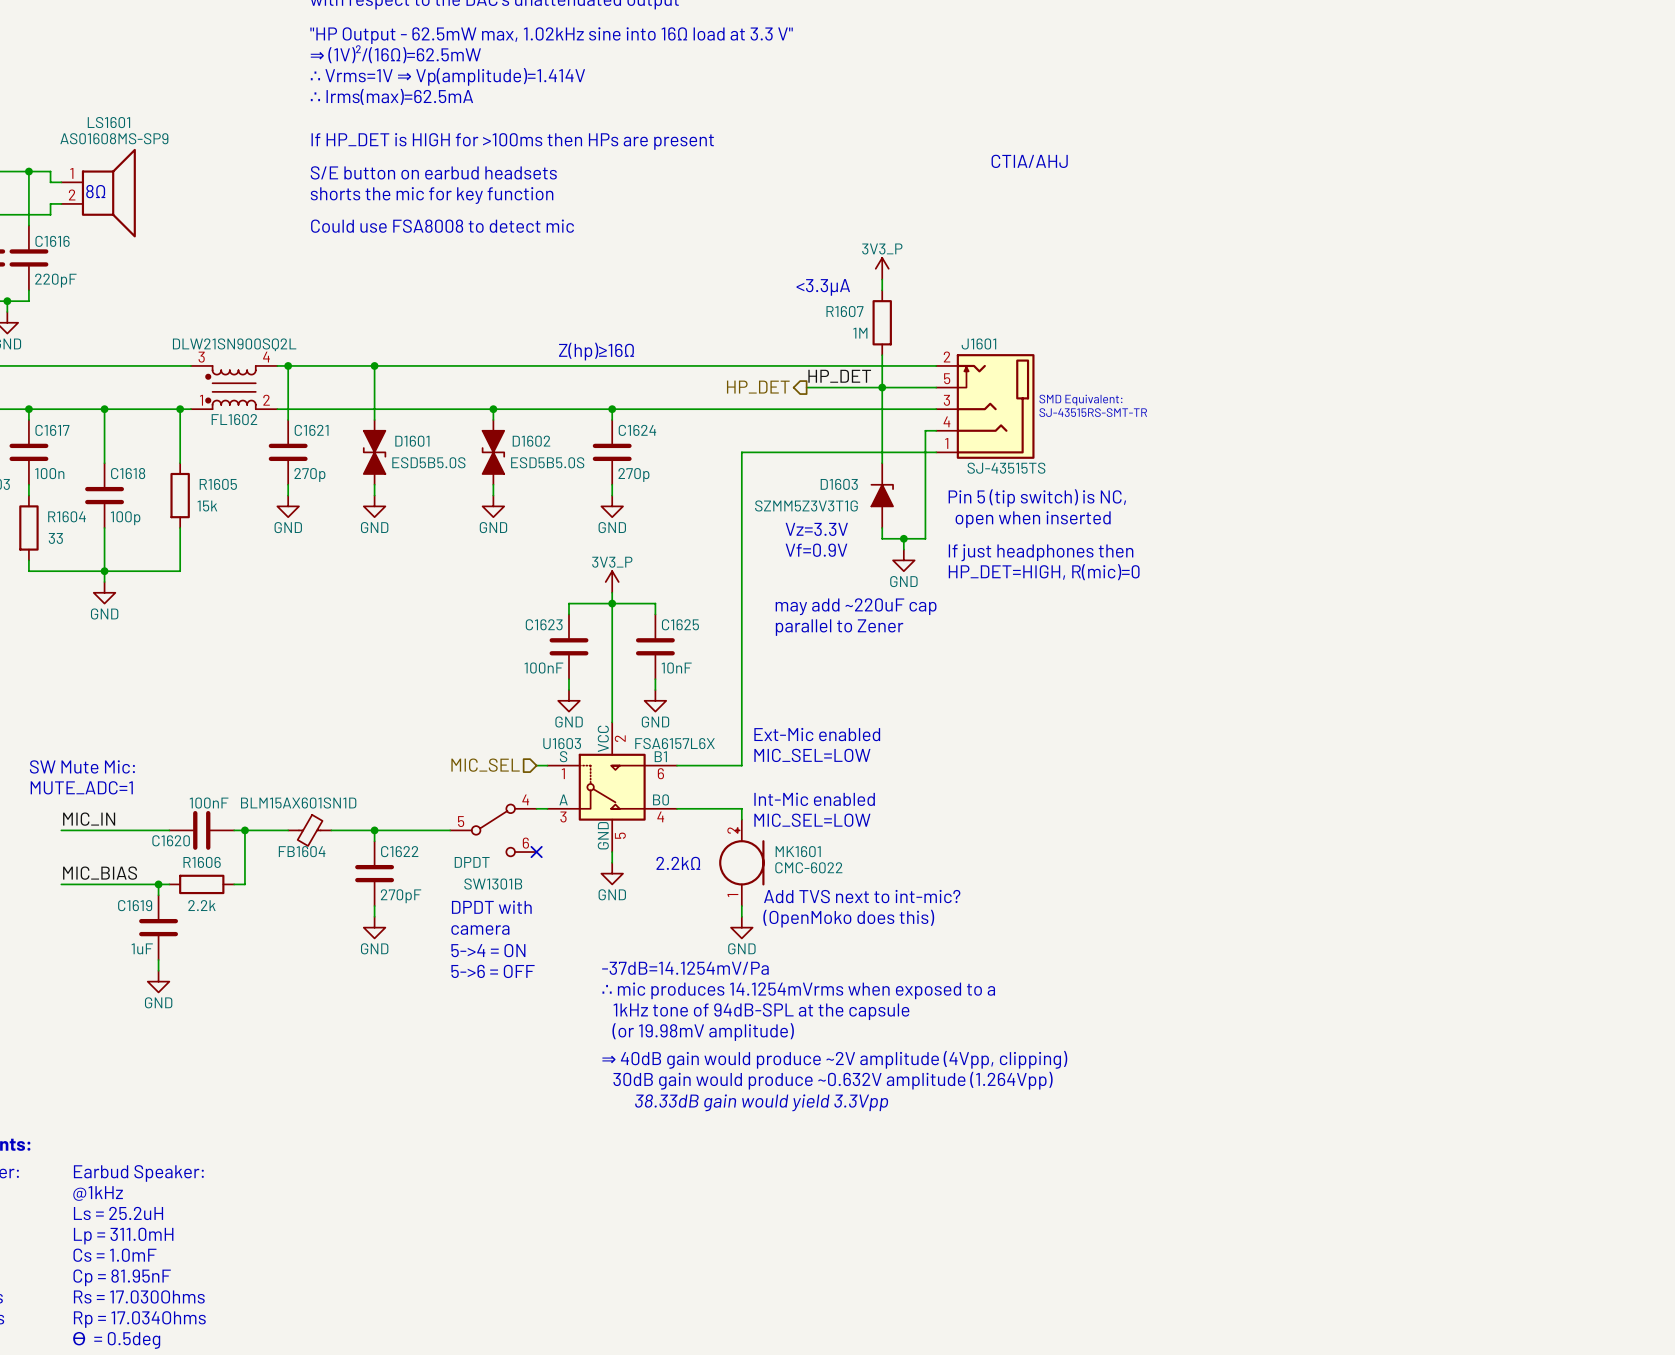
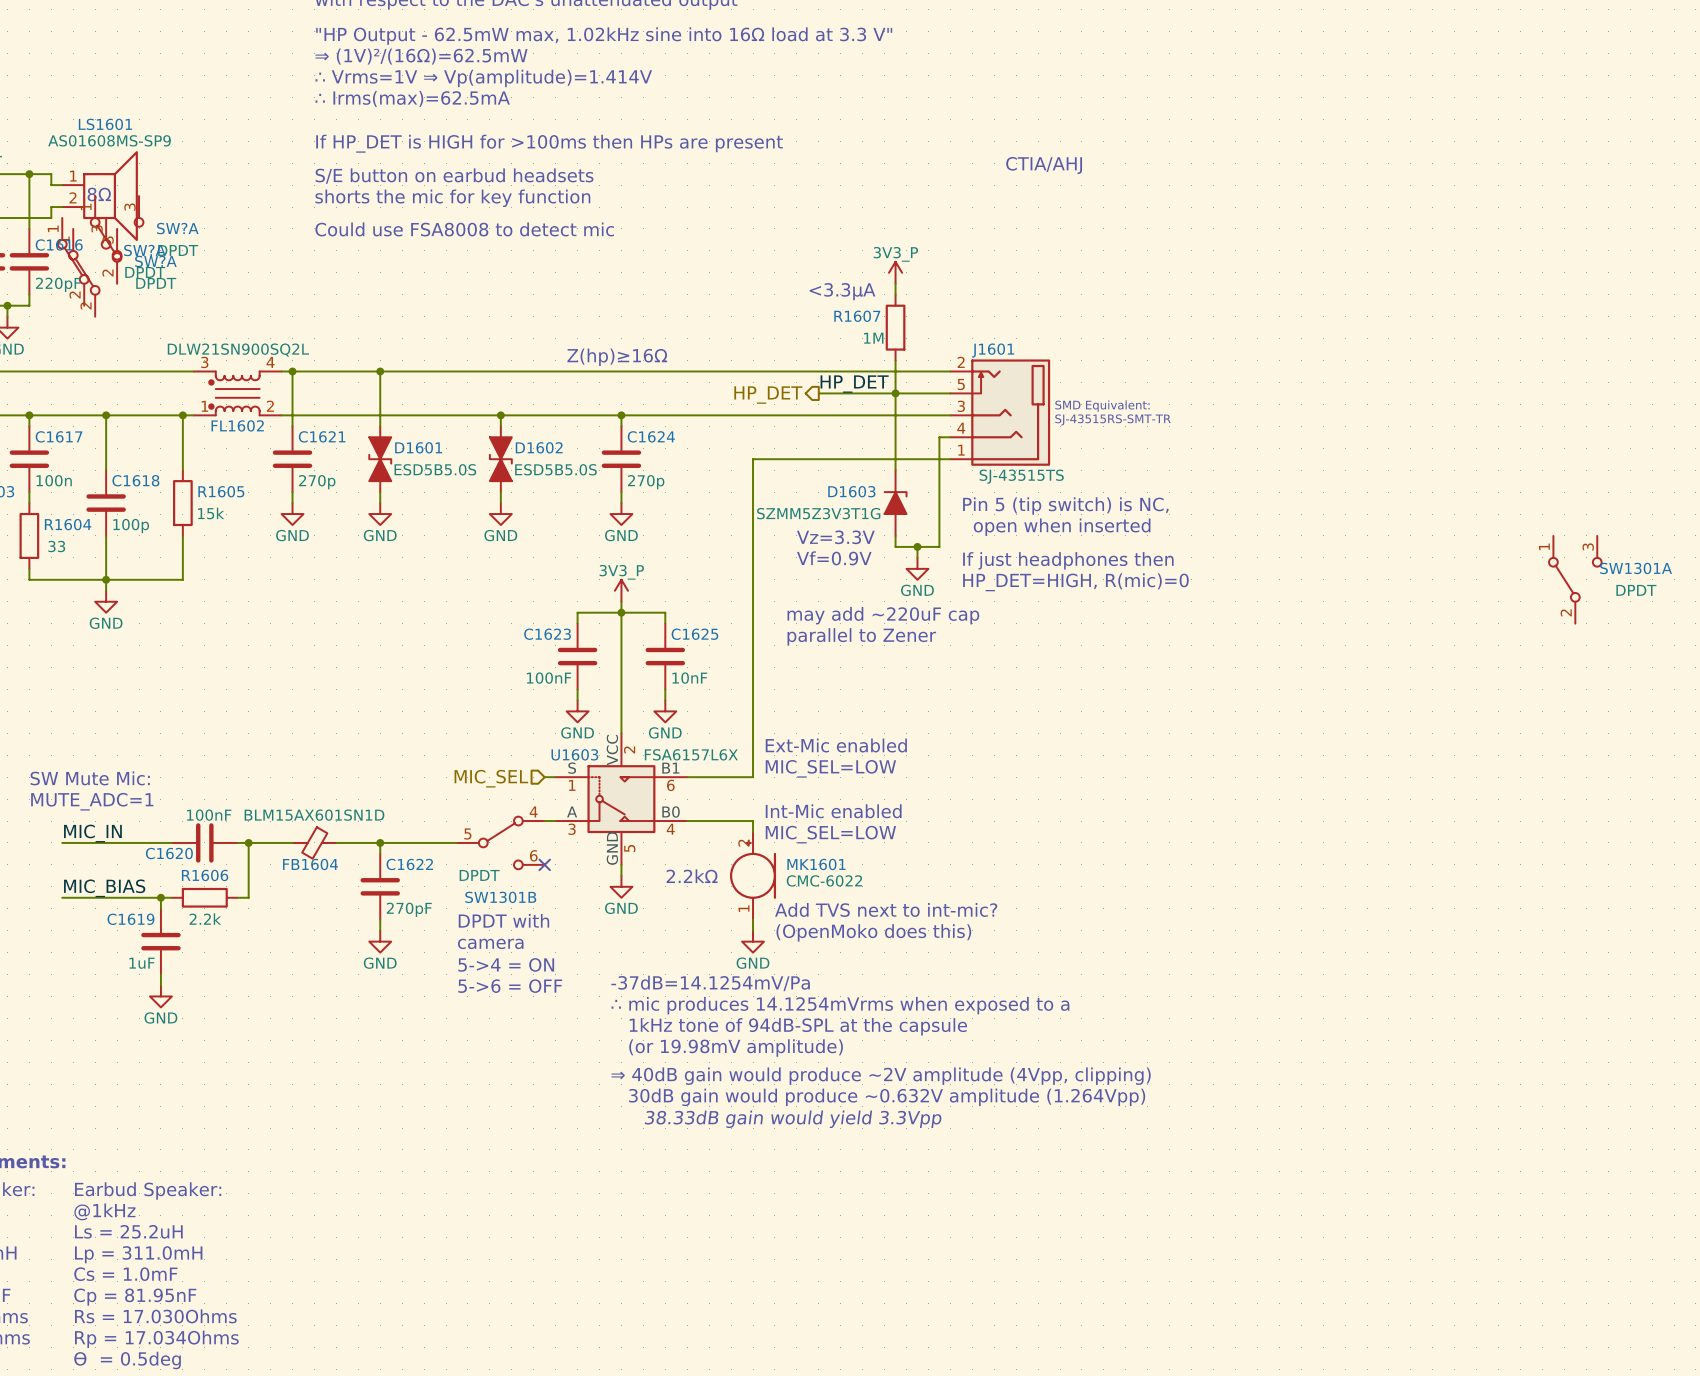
SW?A: none -> DPDT (117, 239)
SW?A: none -> DPDT (84, 261)
SW?A: none -> DPDT (95, 272)
SW1301A: none -> DPDT (1575, 579)

